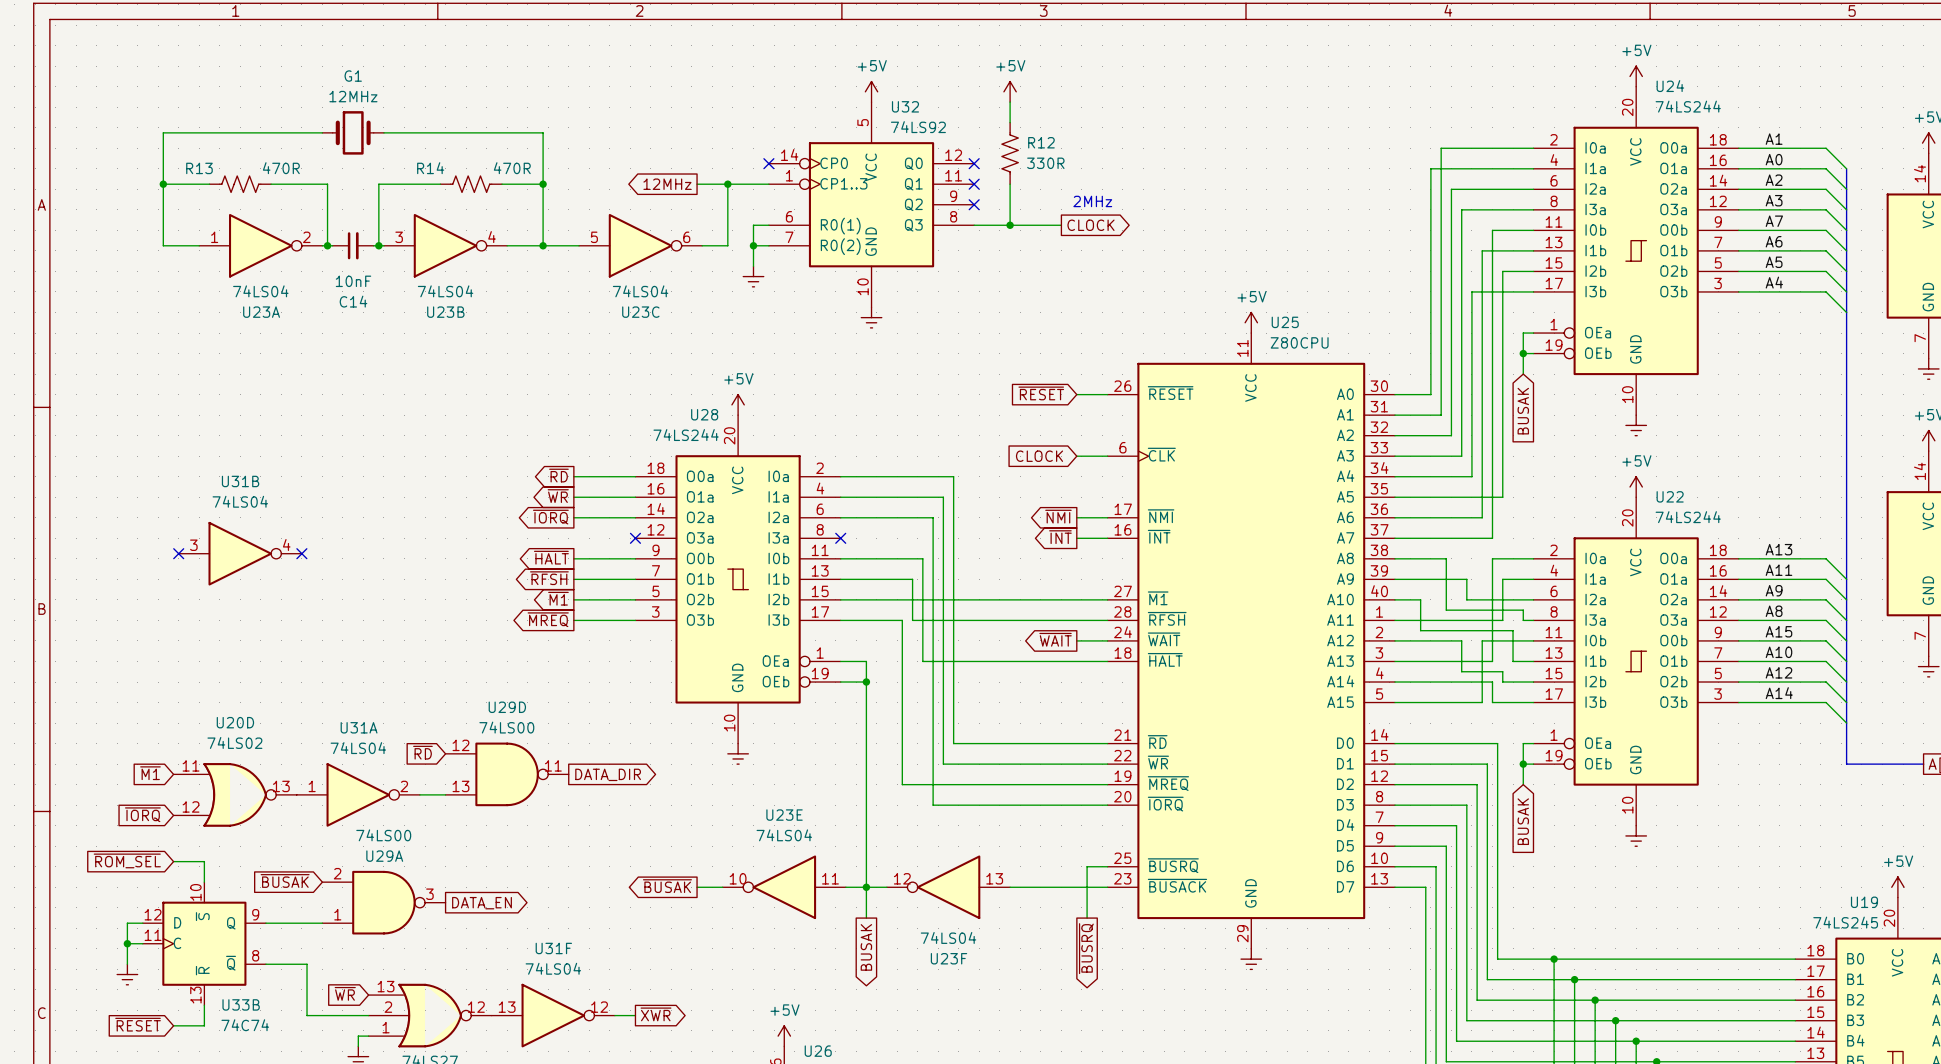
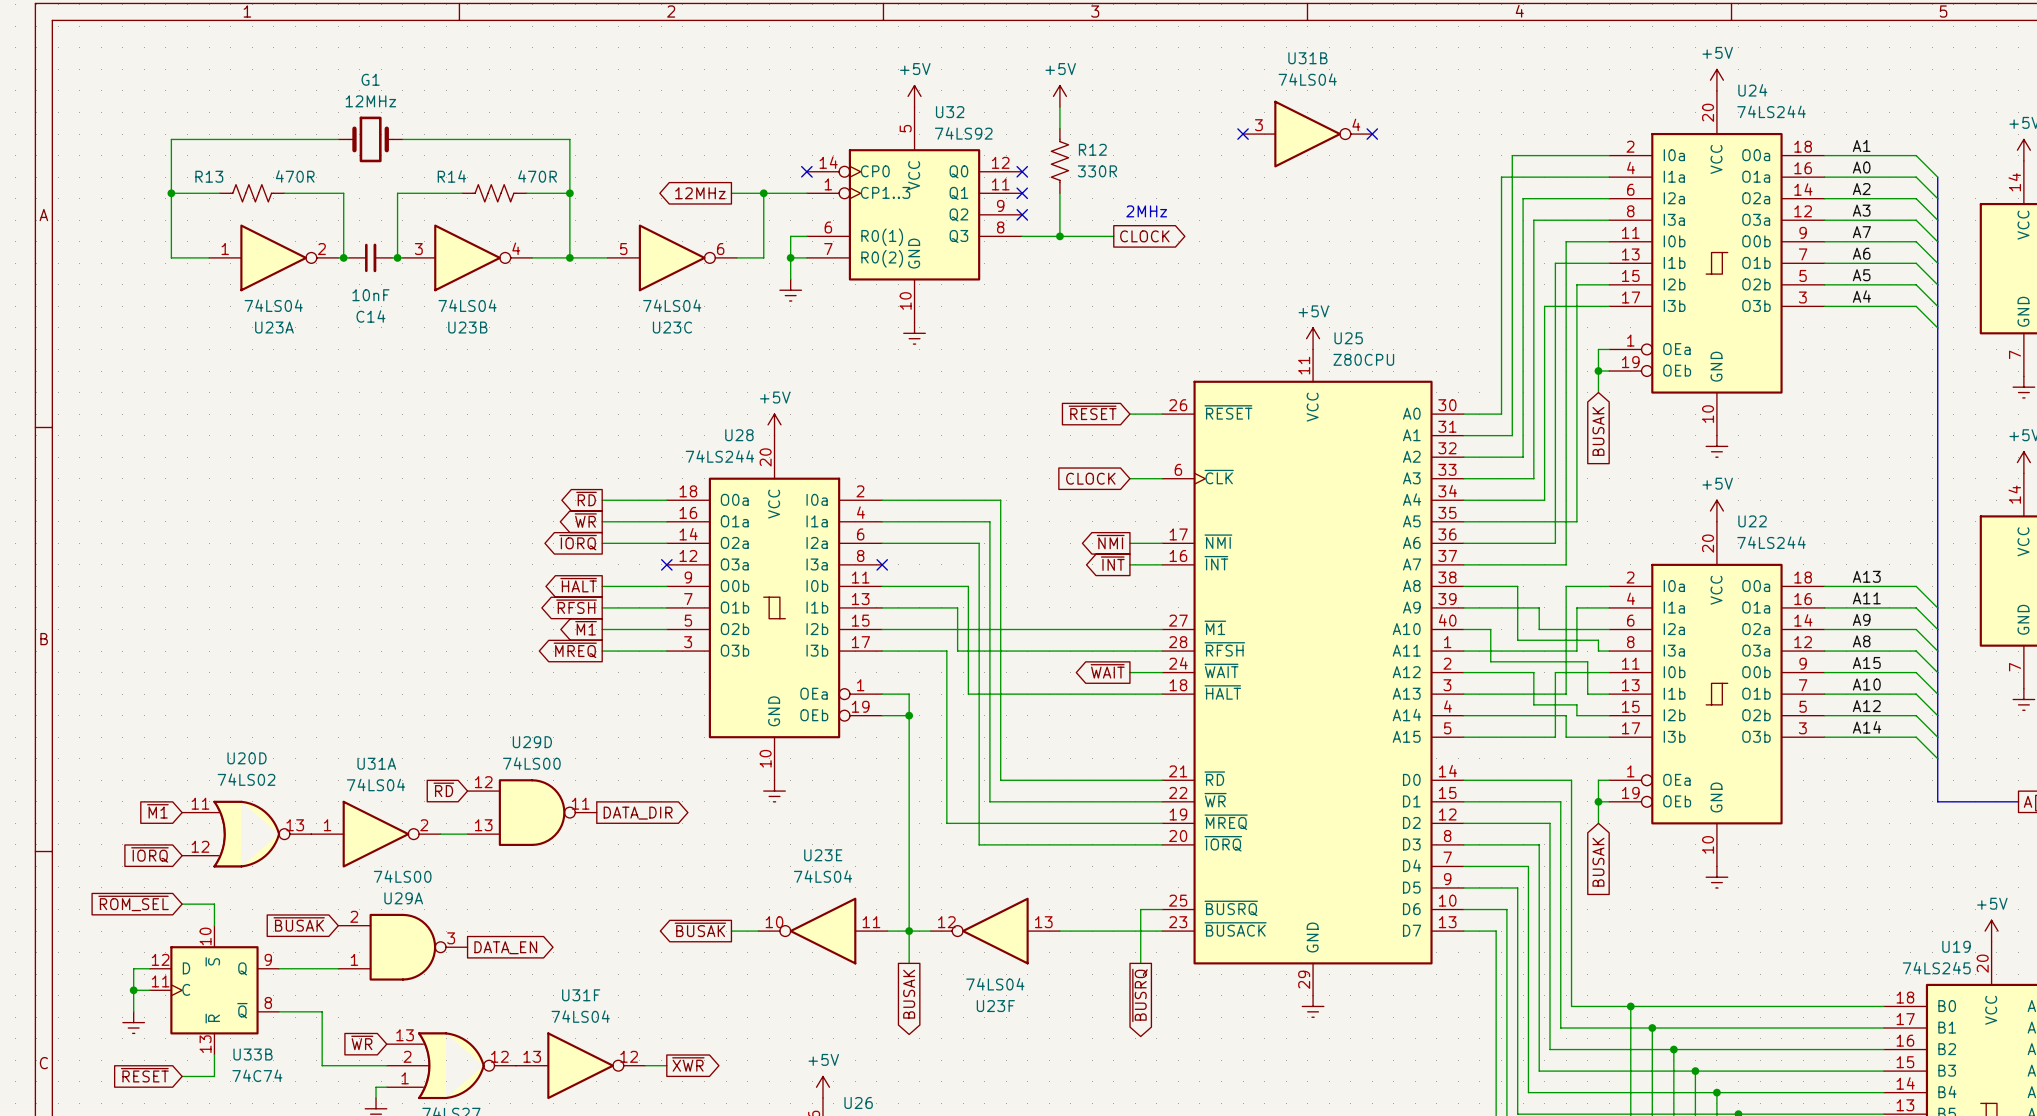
no-connect mark: none -> (1243, 134)
no-connect mark: none -> (1372, 134)
no-connect mark: (178, 553) -> none
U31B position: (240, 553) -> (1307, 134)
no-connect mark: (301, 553) -> none

